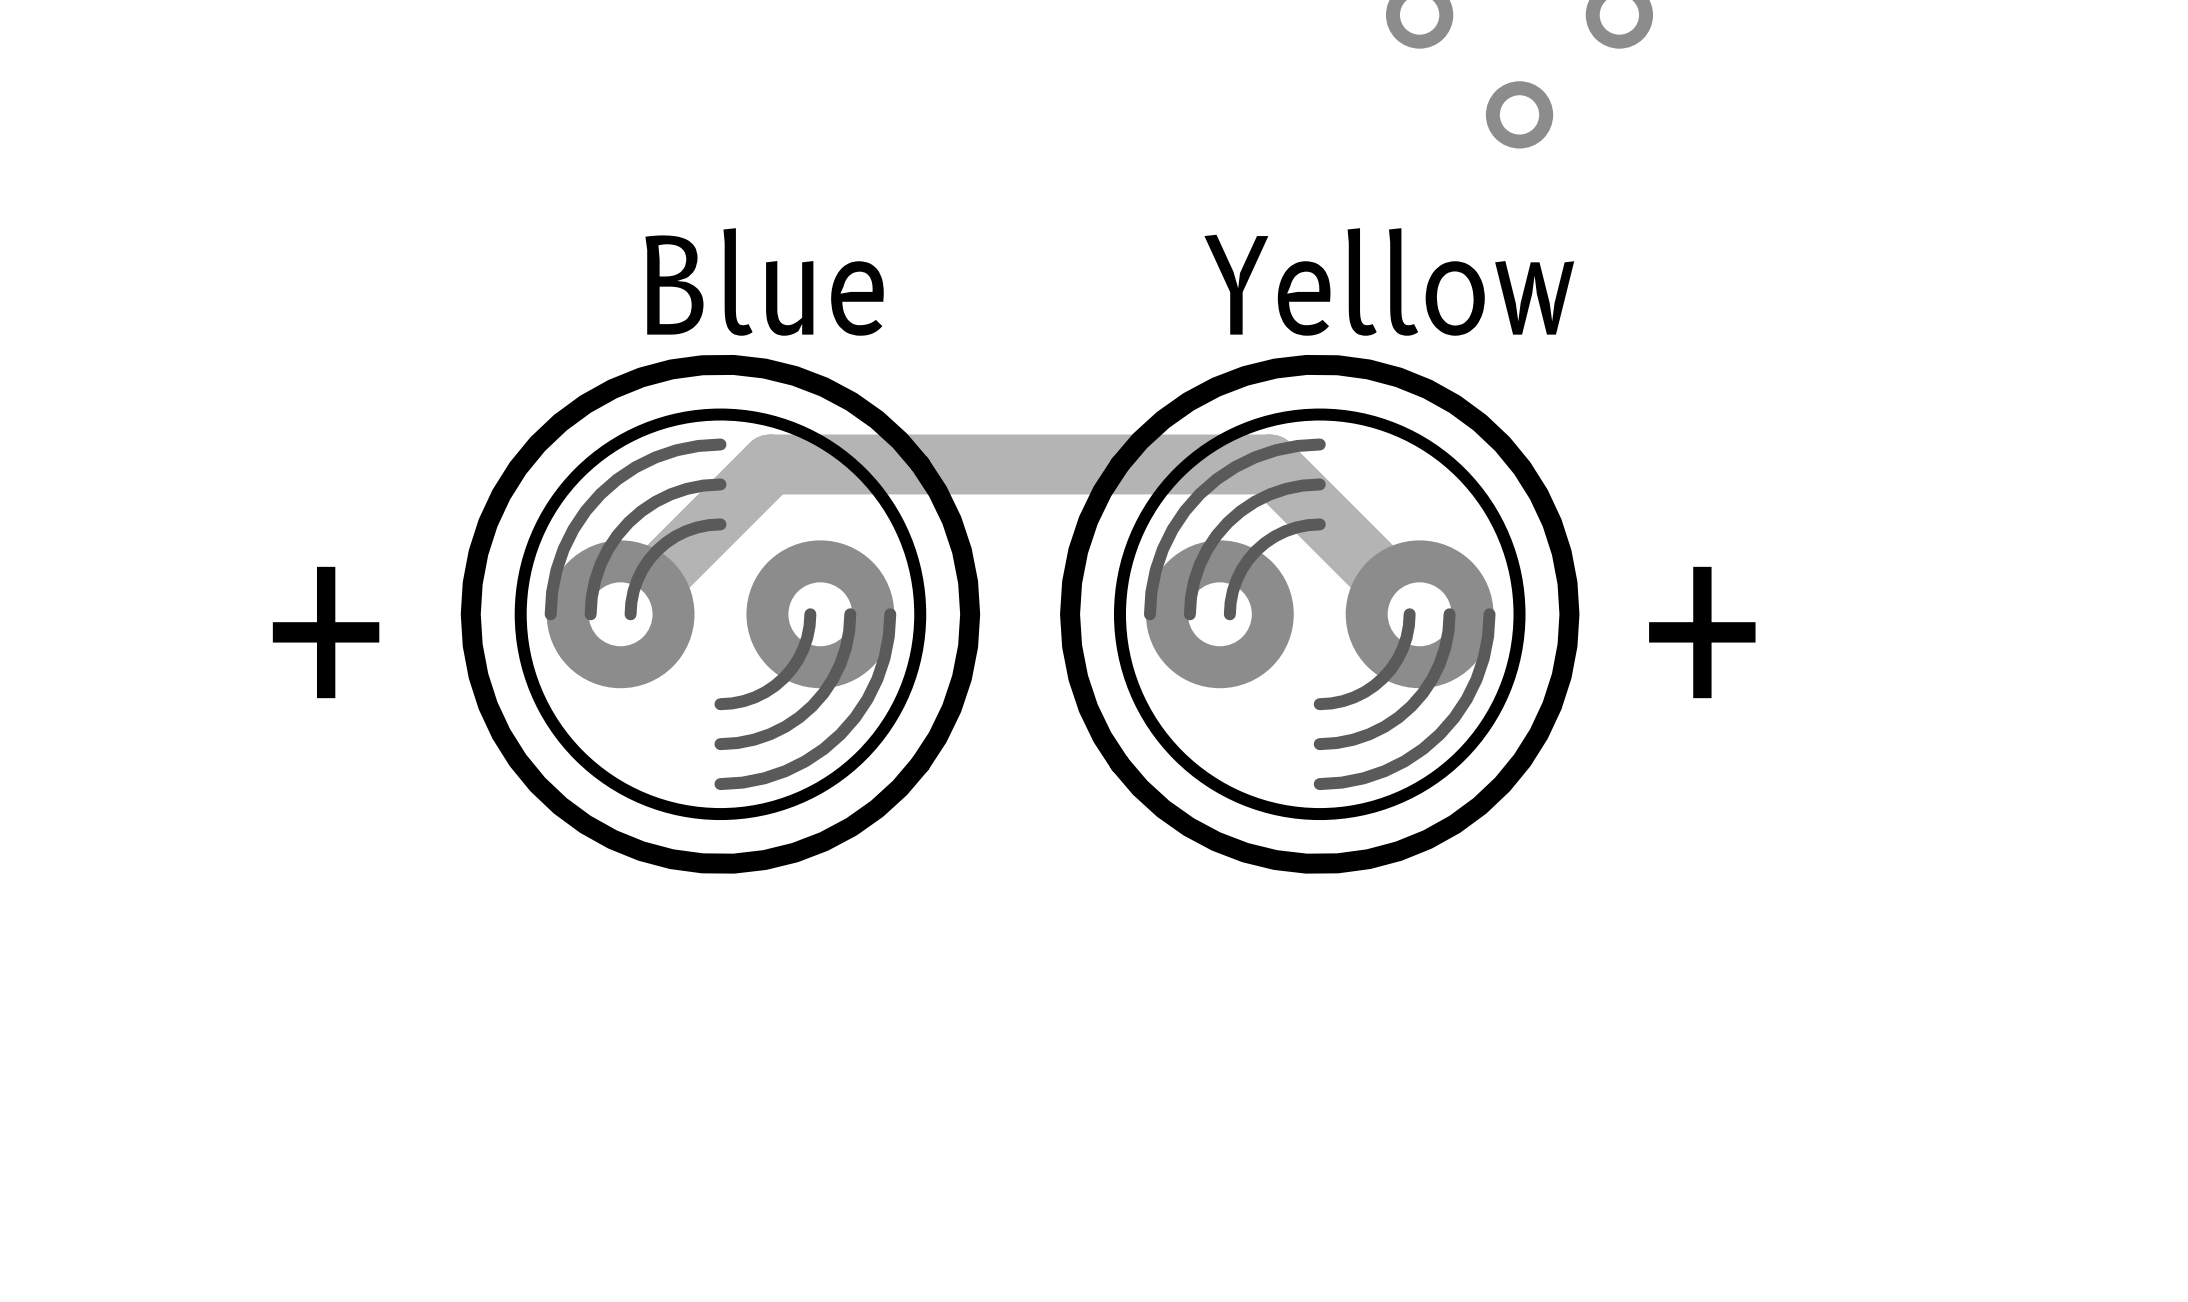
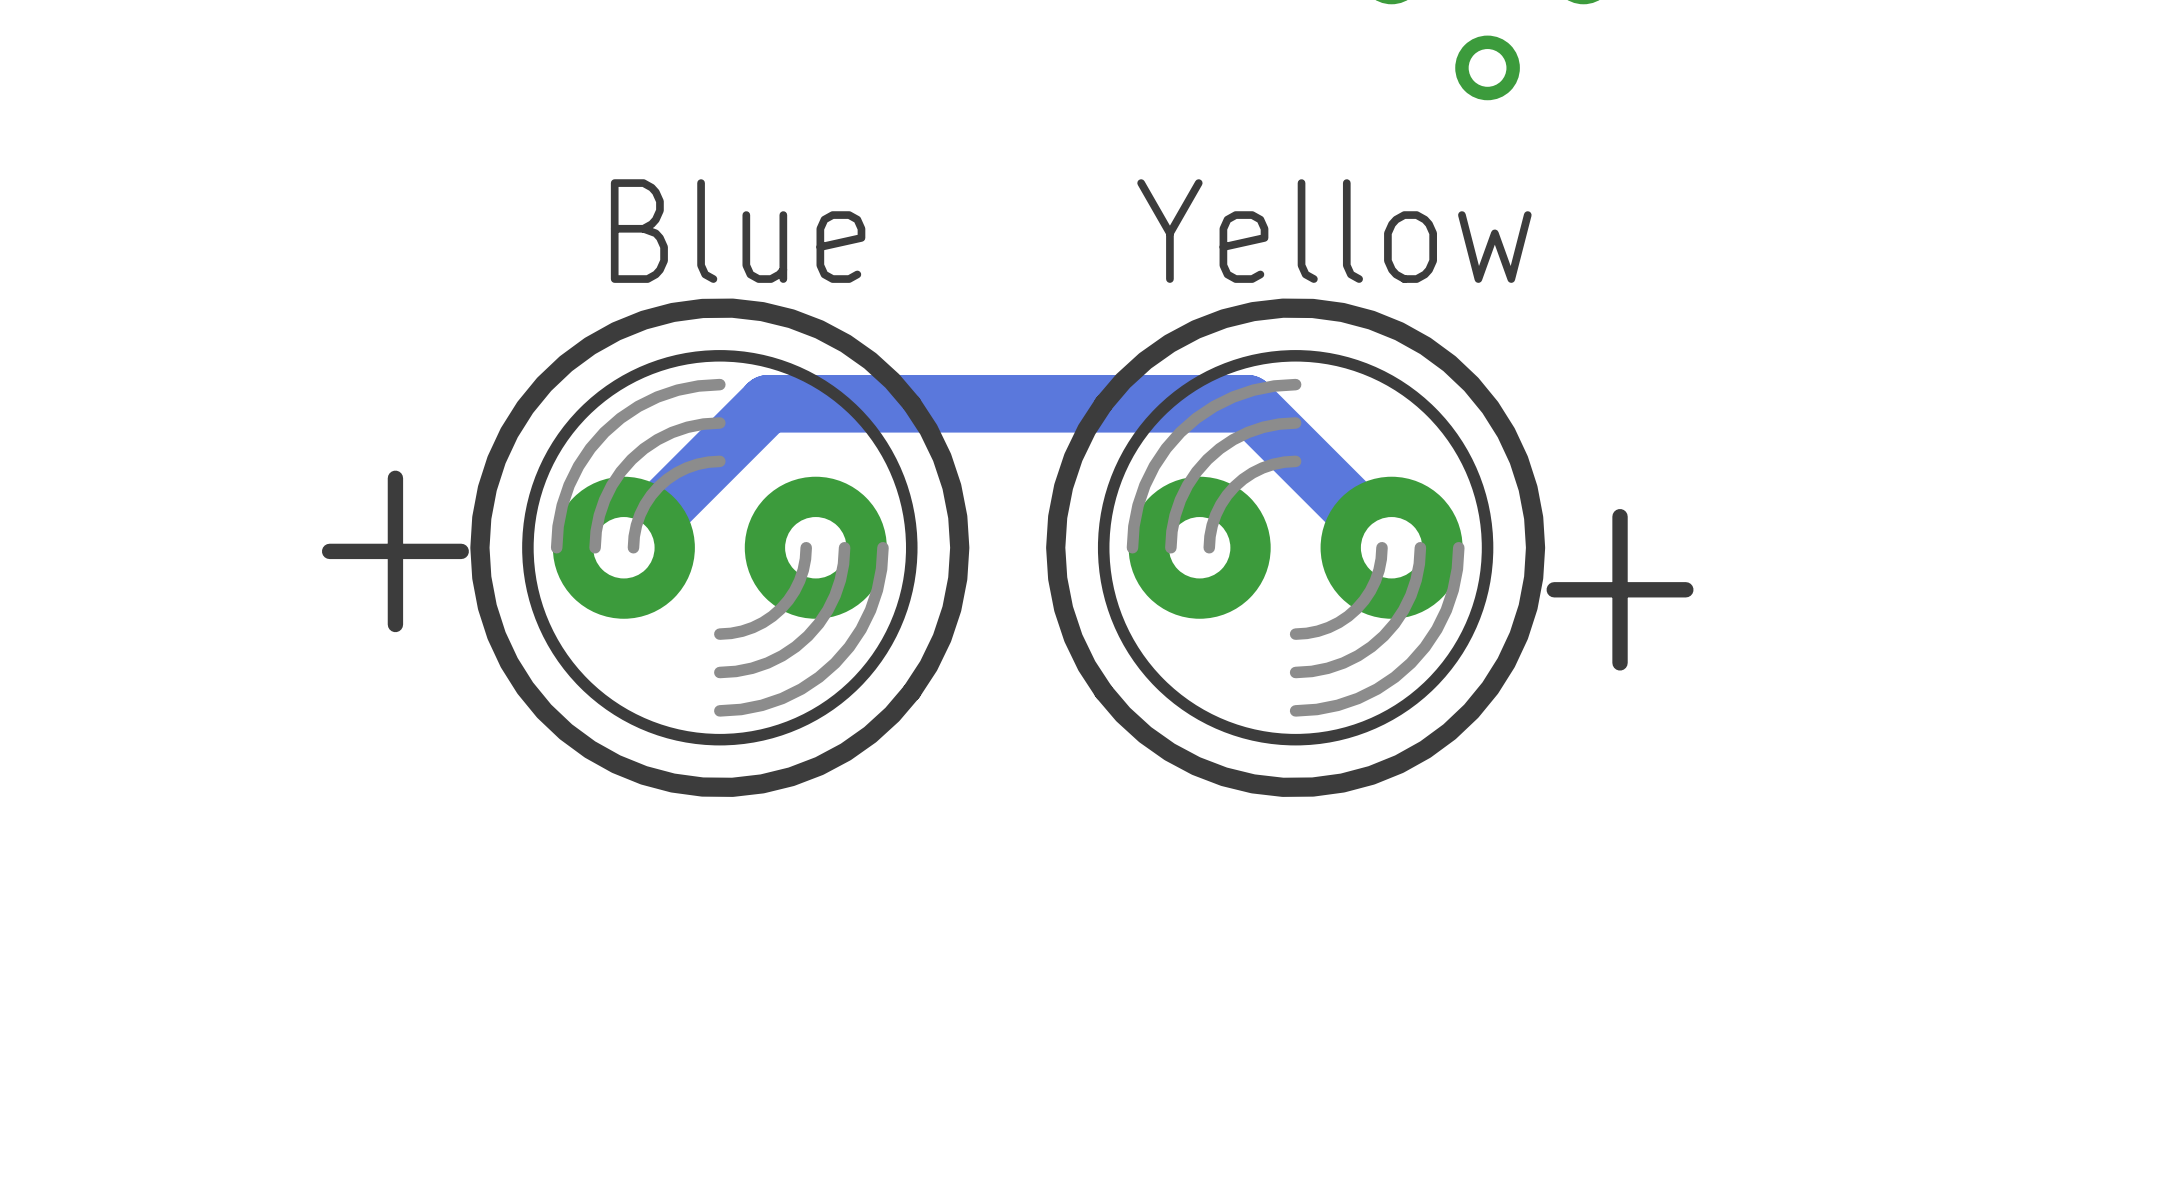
part text position: + (326, 632) -> + (395, 551)
part text position: + (1702, 632) -> + (1620, 589)

